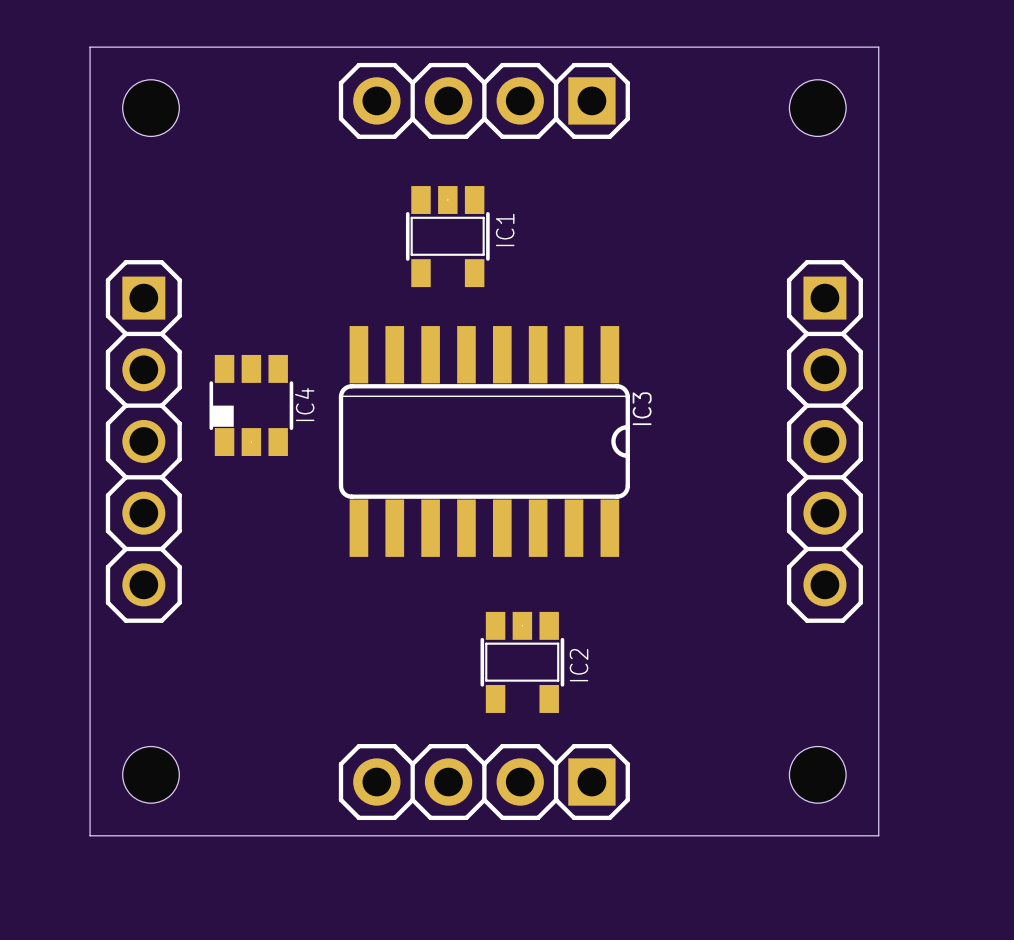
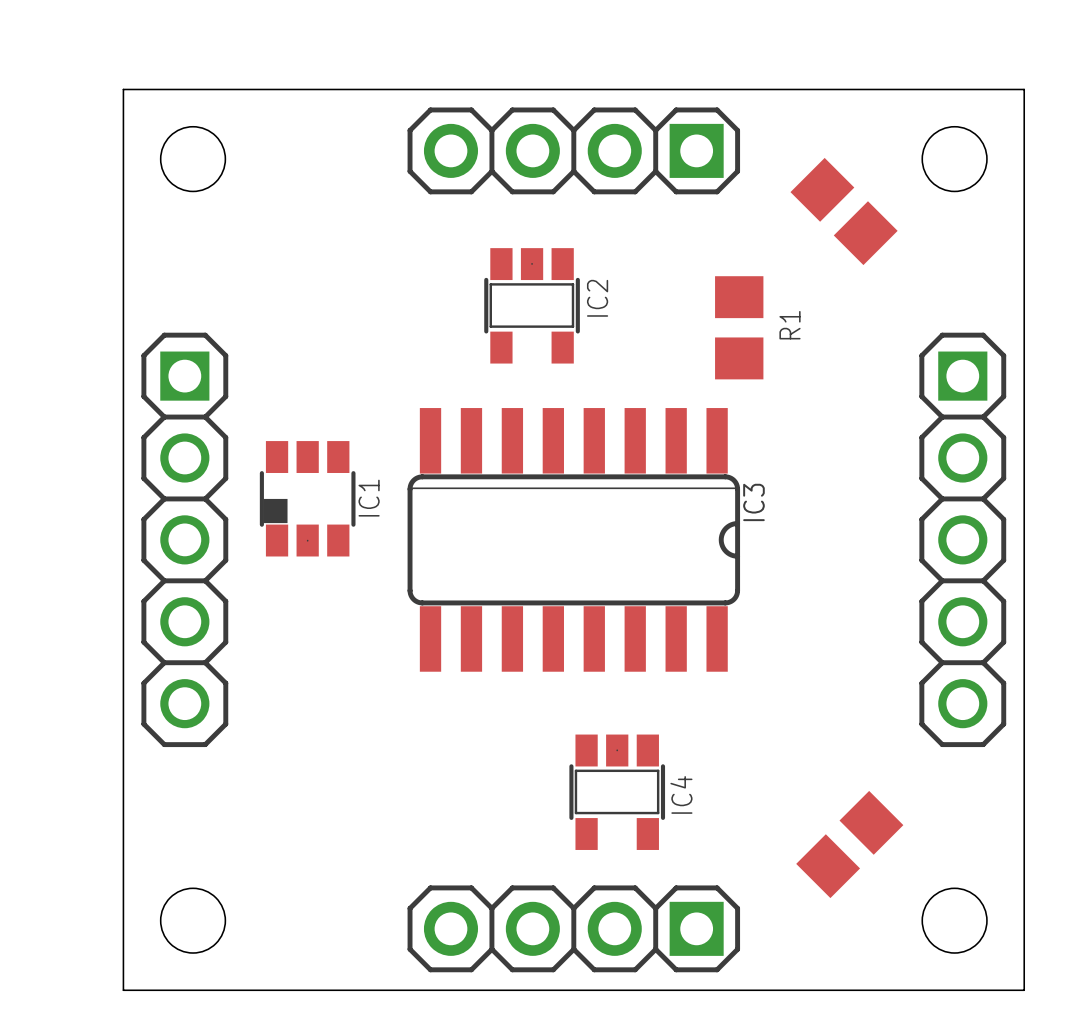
part: none -> (844, 211)
IC1 name: IC1 (505, 229) -> IC2 (597, 298)
R1: none -> (739, 327)
IC4 name: IC4 (304, 404) -> IC1 (369, 498)
IC2 name: IC2 (579, 665) -> IC4 (681, 794)
part: none -> (849, 844)

